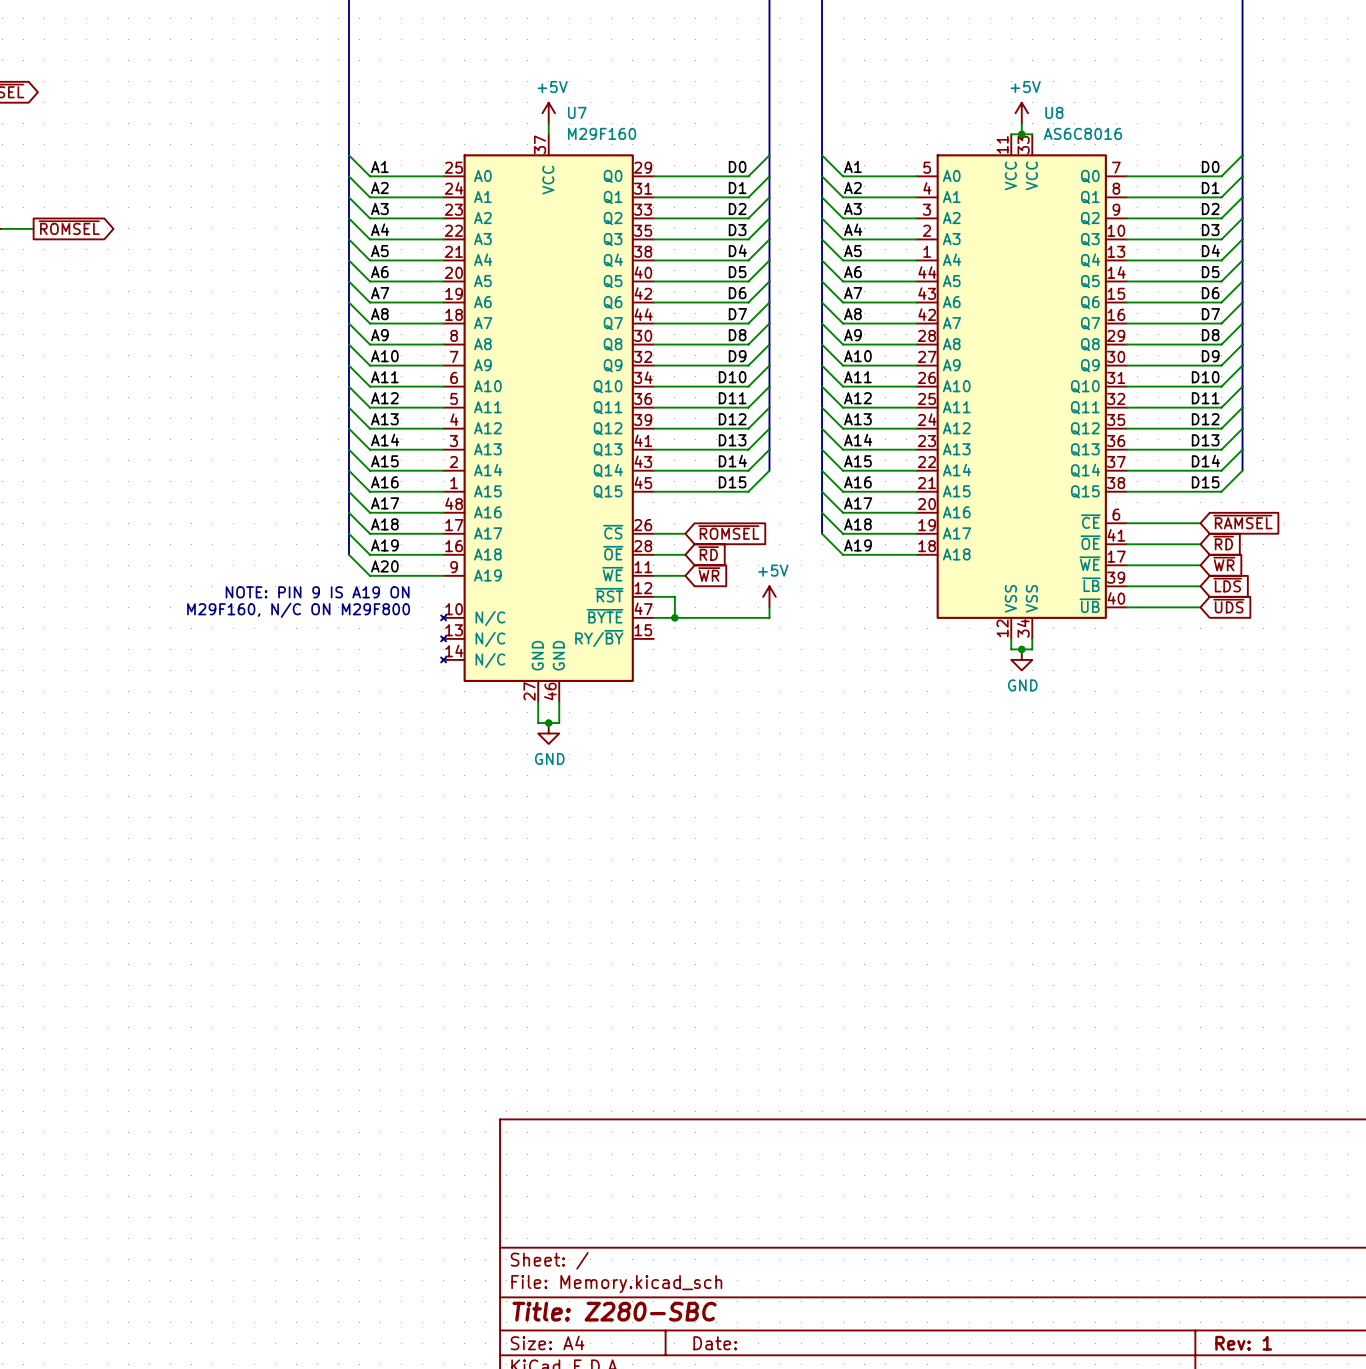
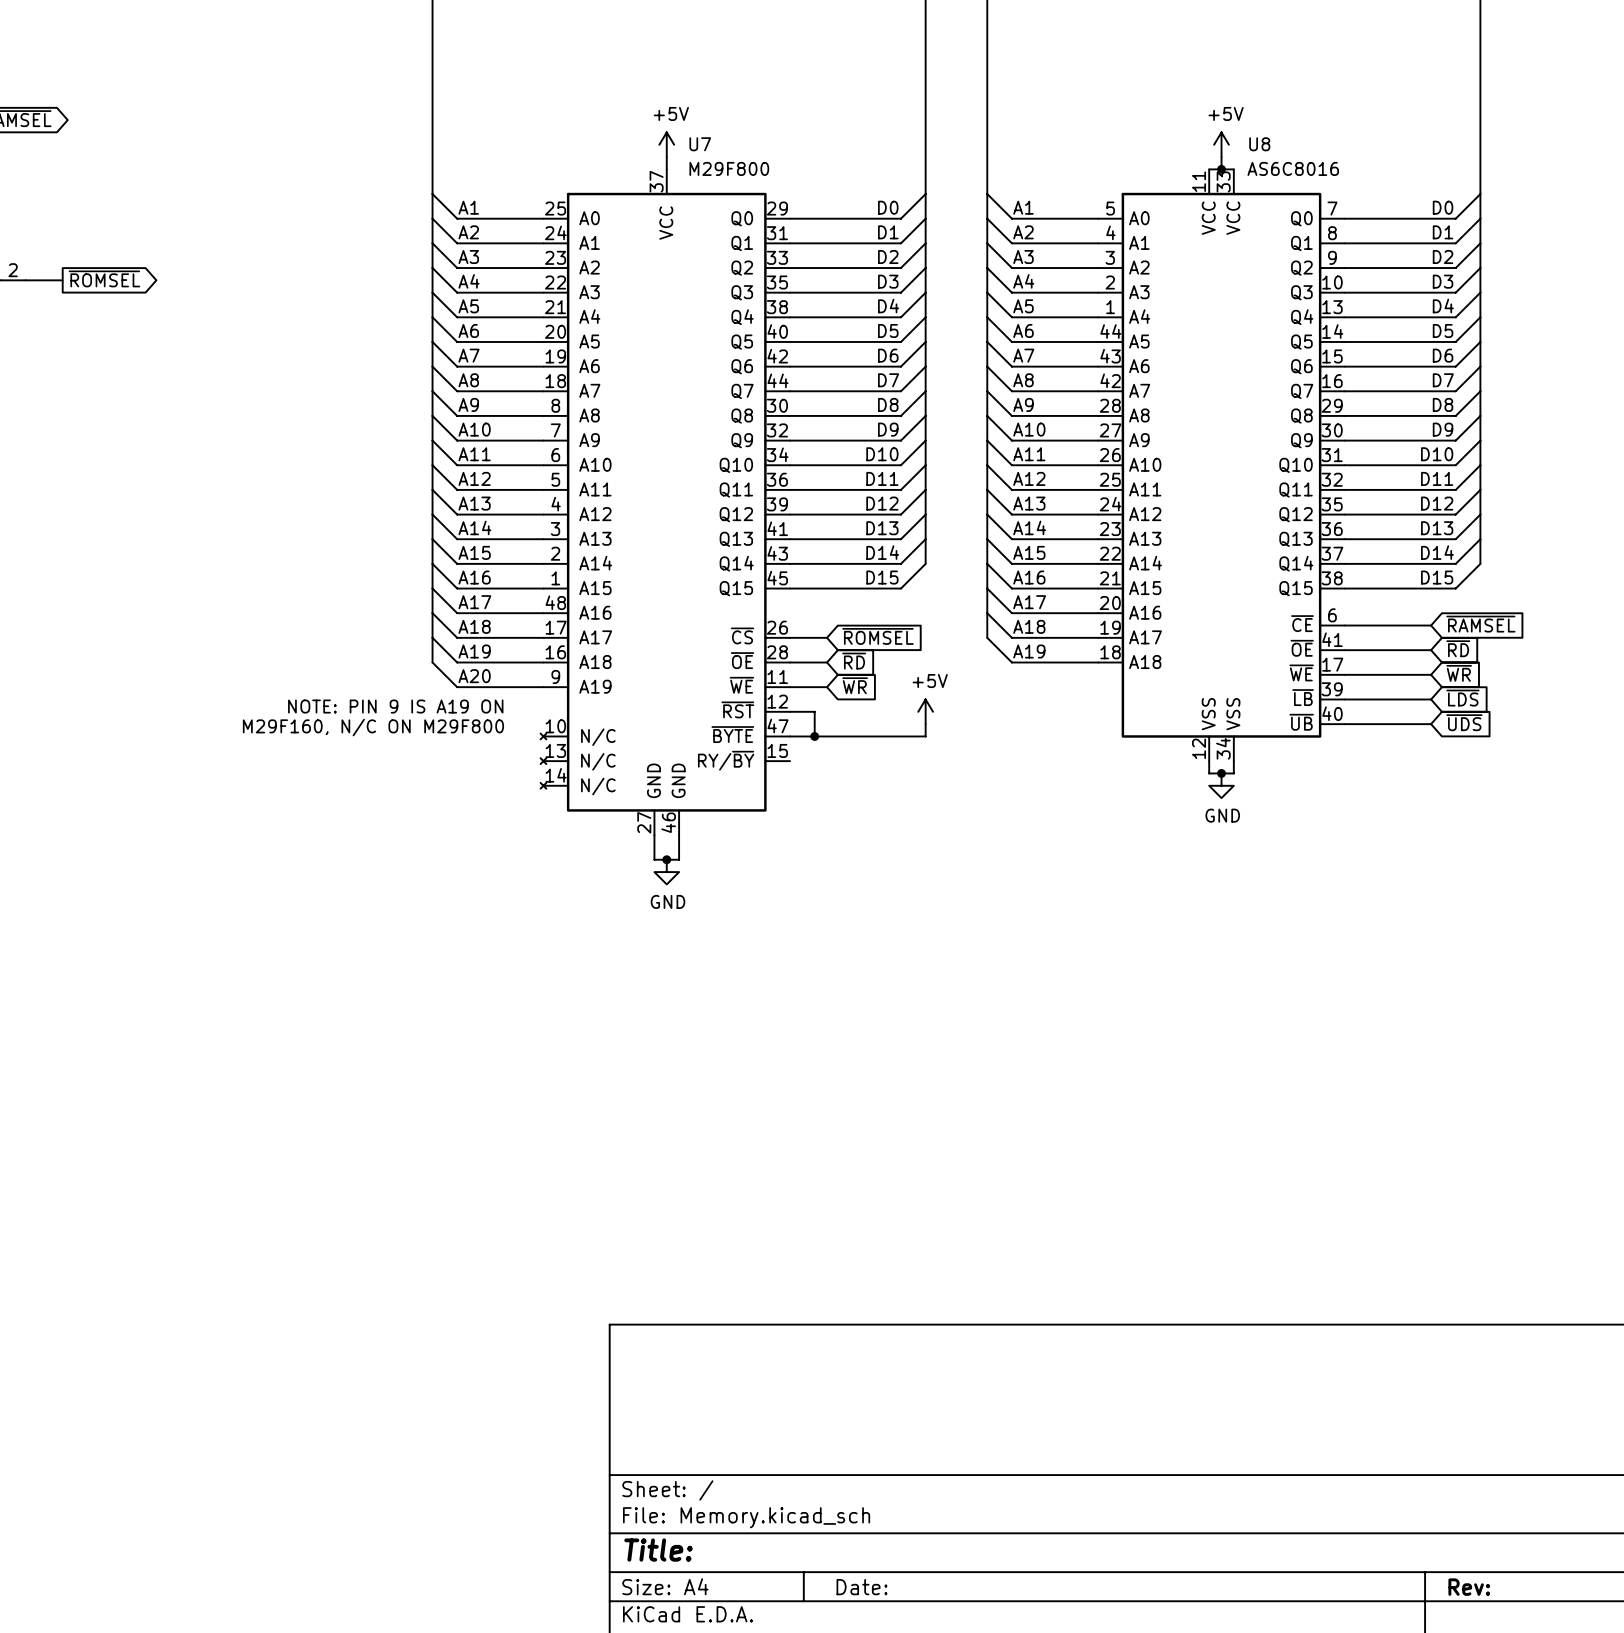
U7 value: M29F160 (602, 133) -> M29F800 (729, 168)
title block: Title: Z280-SBC (614, 1311) -> Title: (658, 1550)
title block: Rev: 1 (1243, 1343) -> Rev: (1469, 1587)

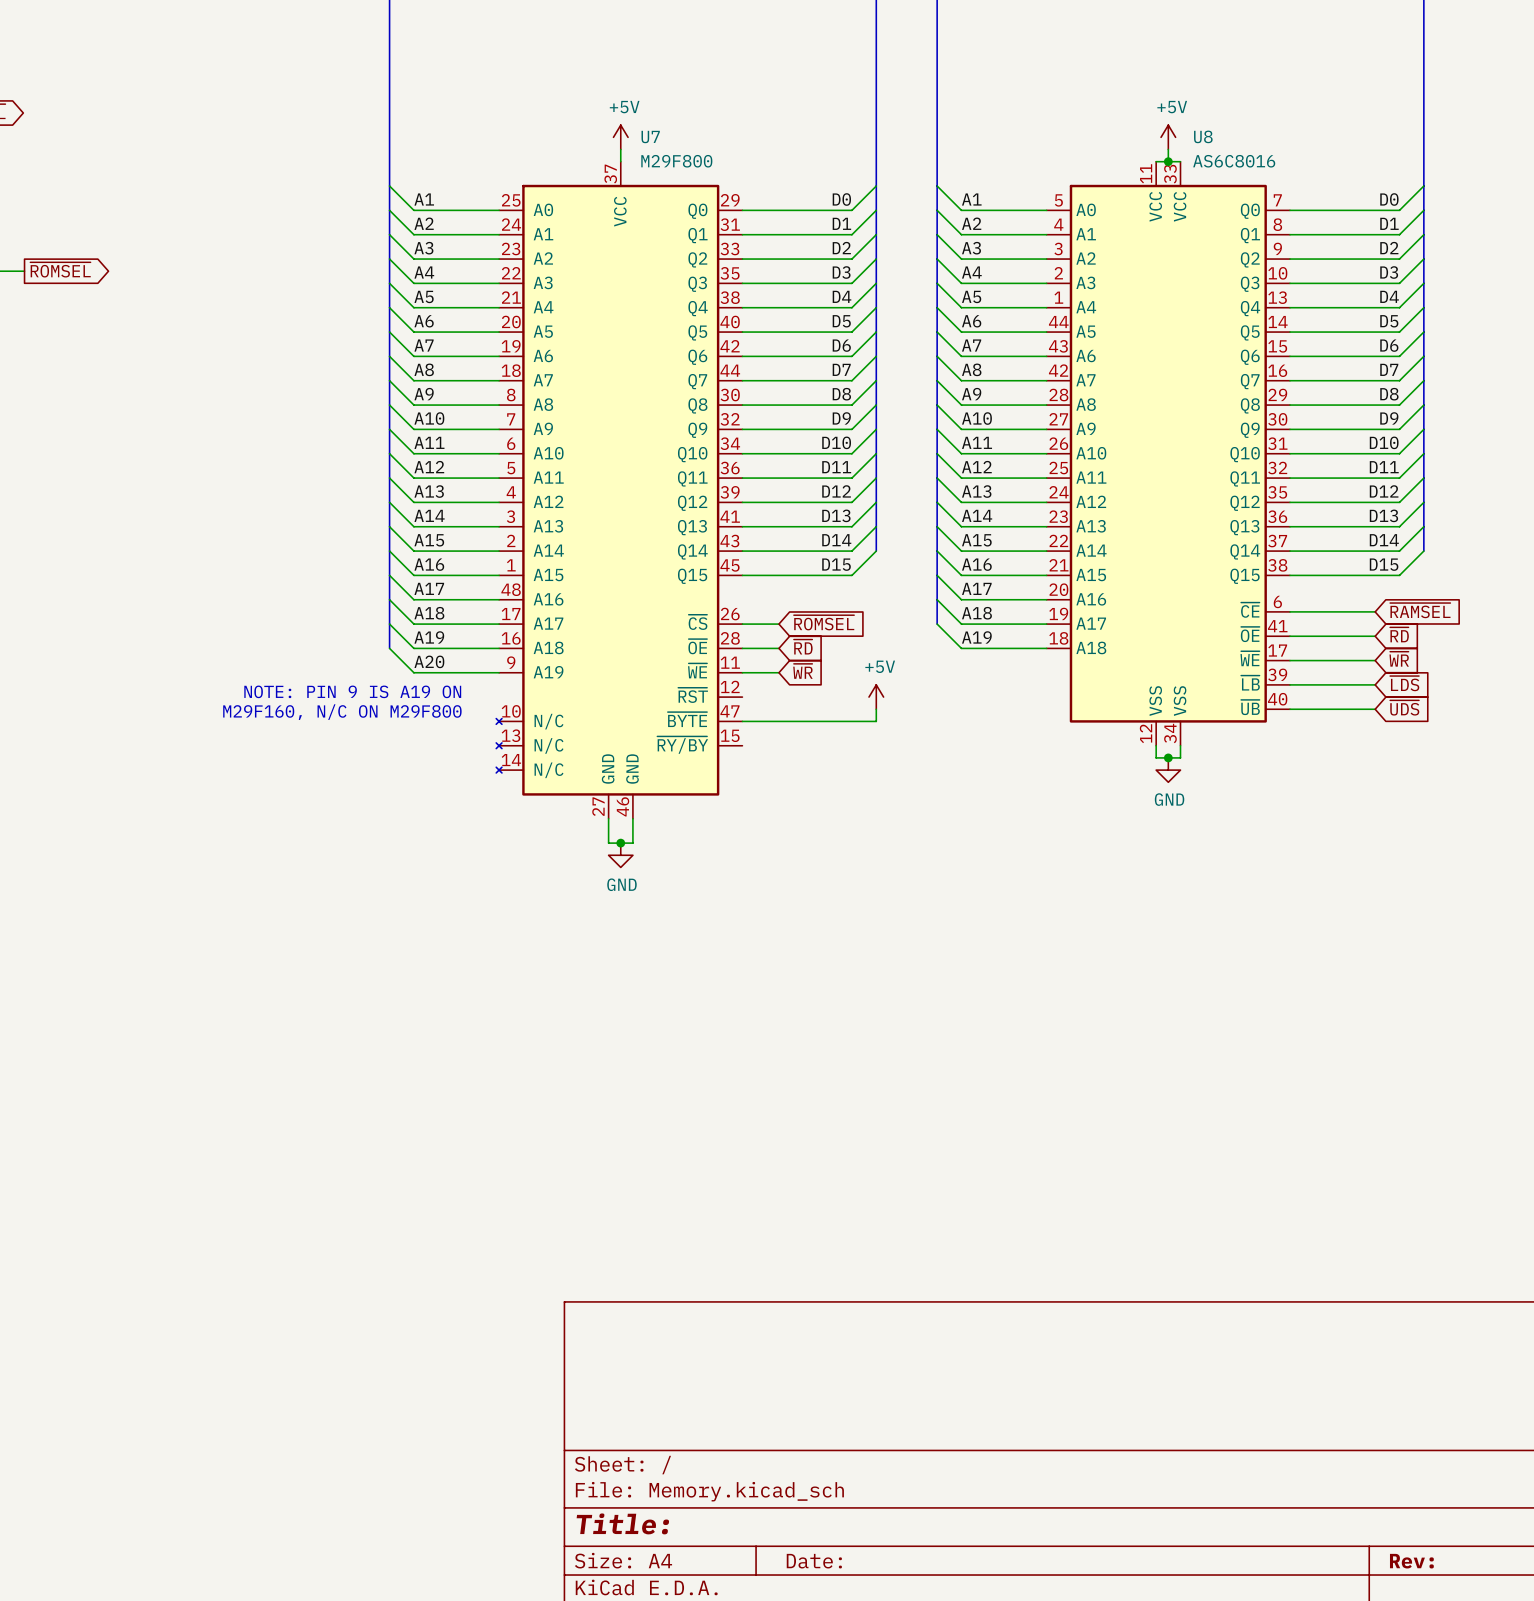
wire: (790, 711) (814, 711) (814, 736) -> none
junction: (814, 736) -> none
U7 pin name: RY/~{BY} (726, 760) -> ~{RY/BY} (682, 745)

